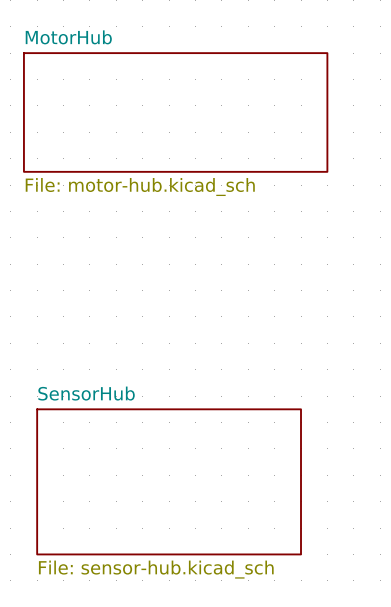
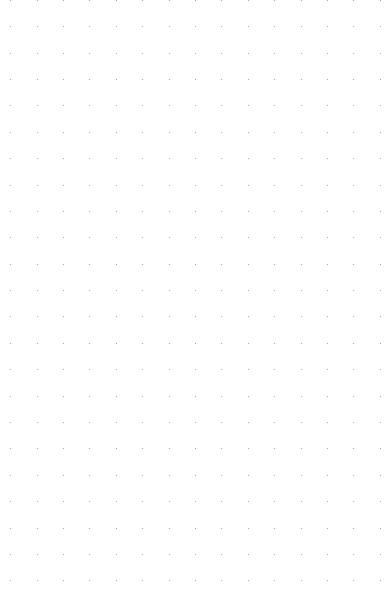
sheet MotorHub: File: motor-hub.kicad_sch (175, 112) -> none
sheet SensorHub: File: sensor-hub.kicad_sch (169, 481) -> none

